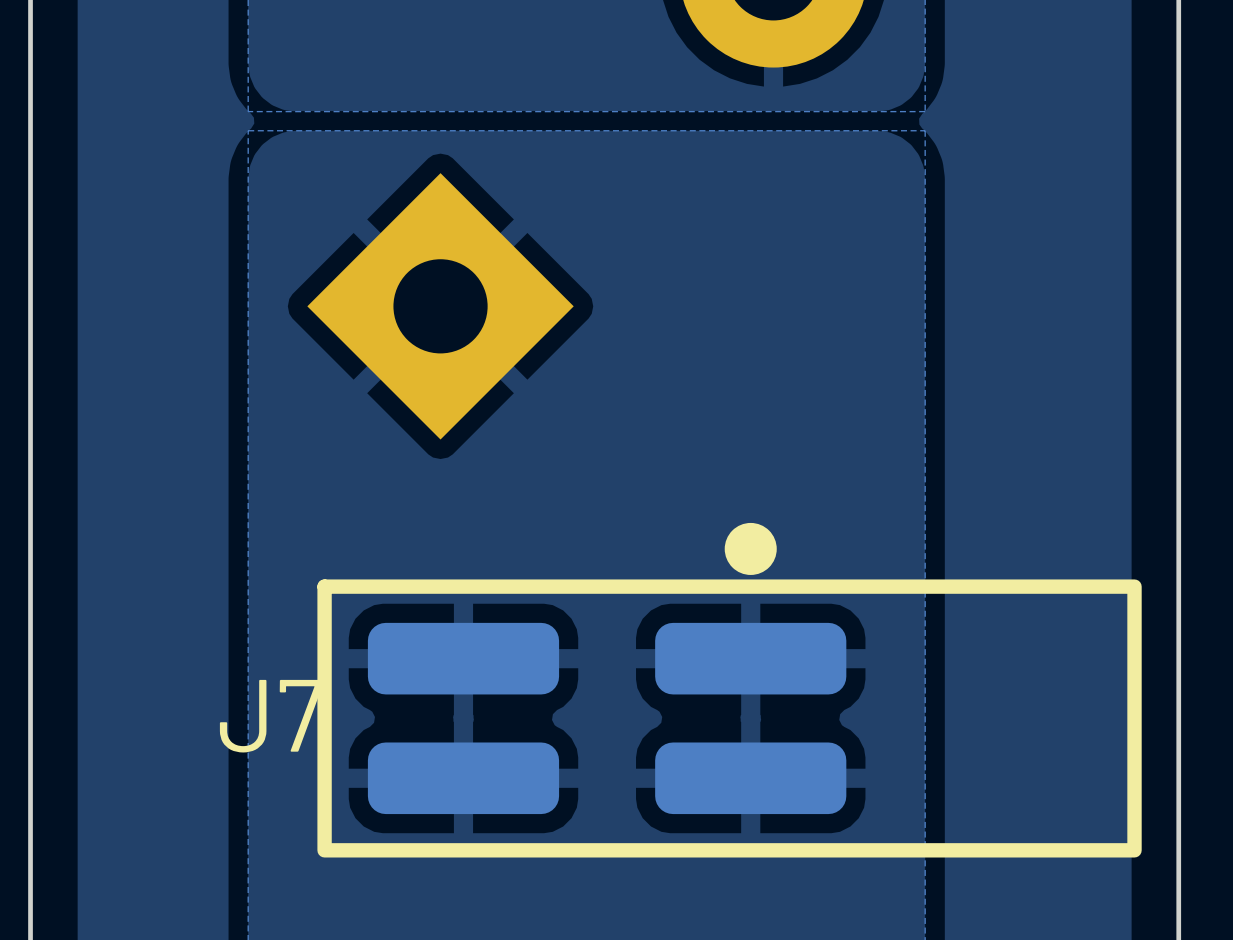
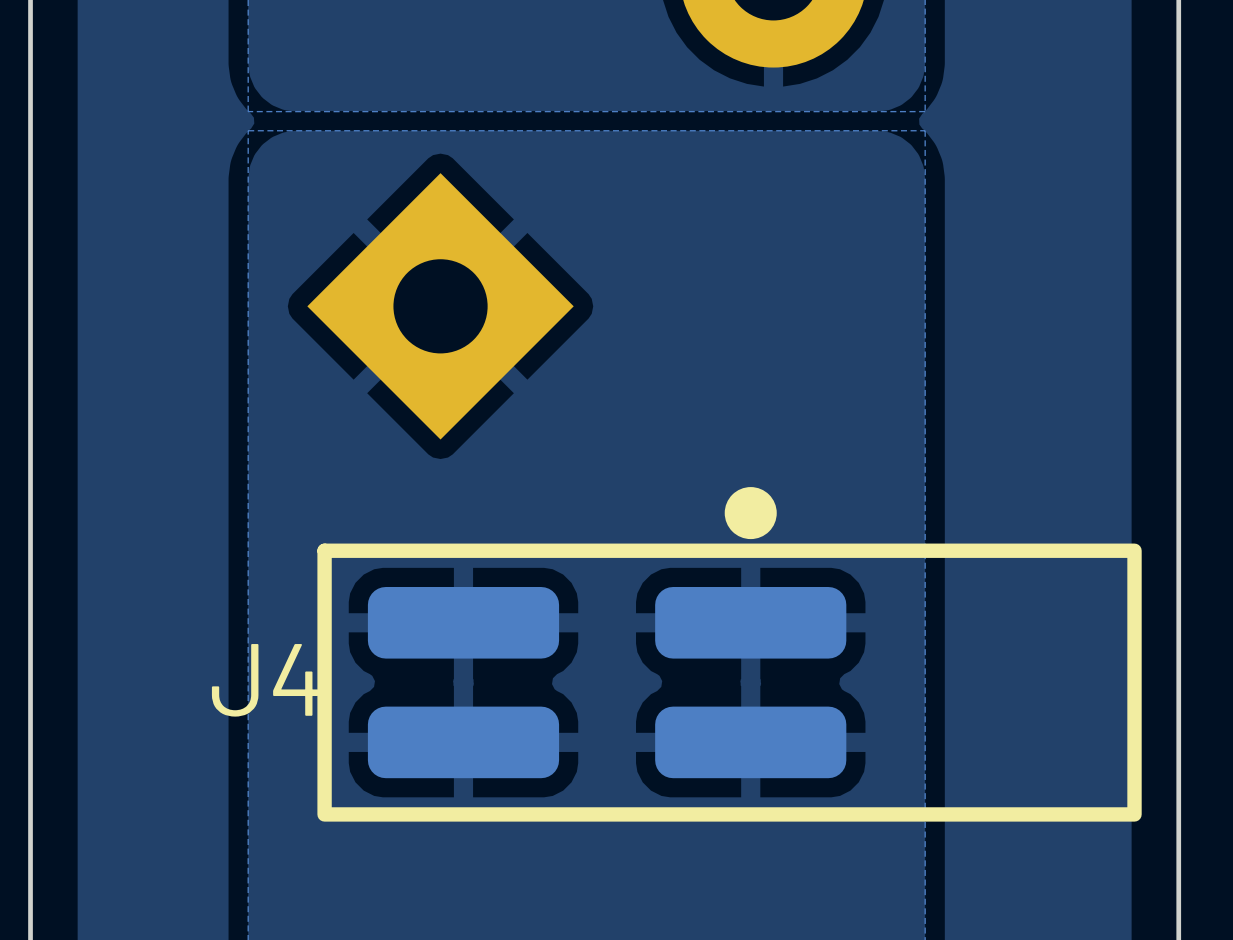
J7 position: (729, 690) -> (729, 654)
J7 name: J7 (271, 716) -> J4 (265, 680)

